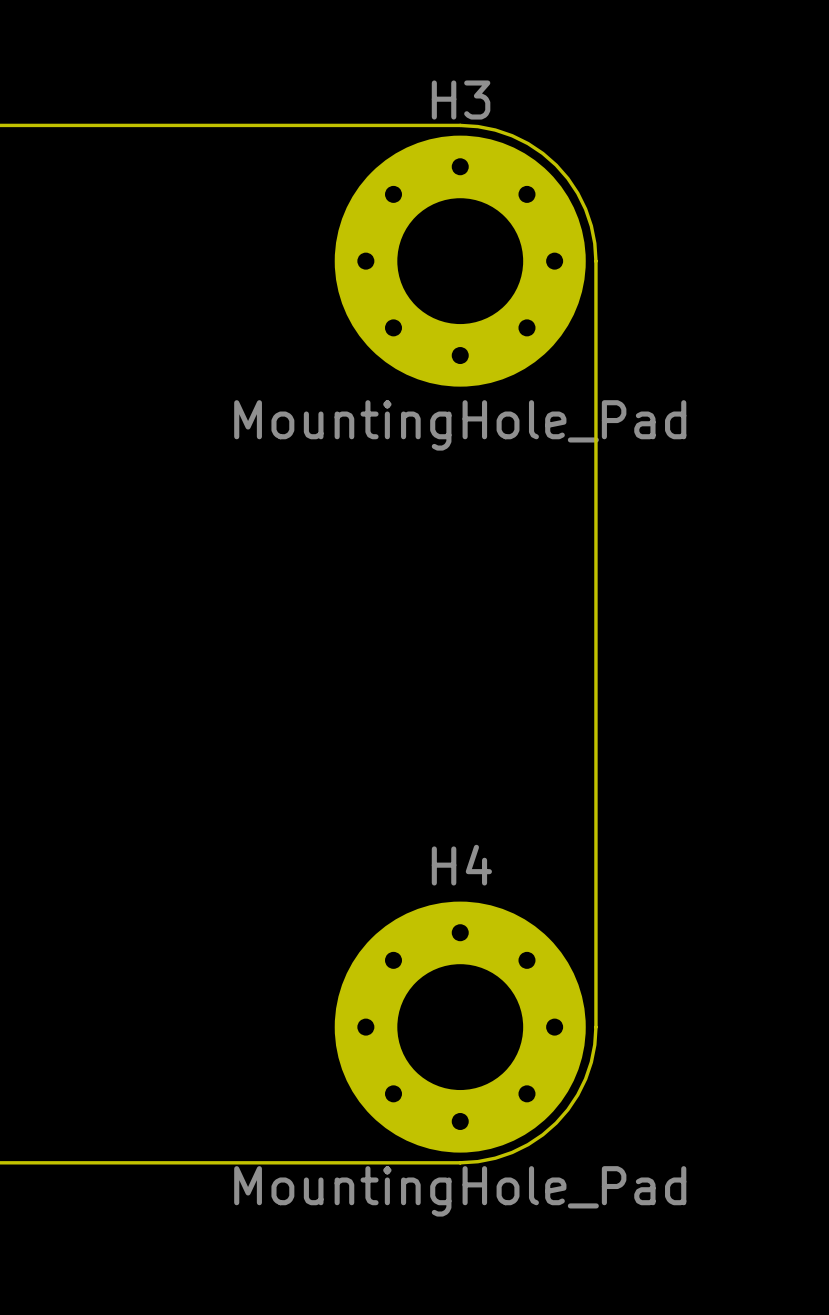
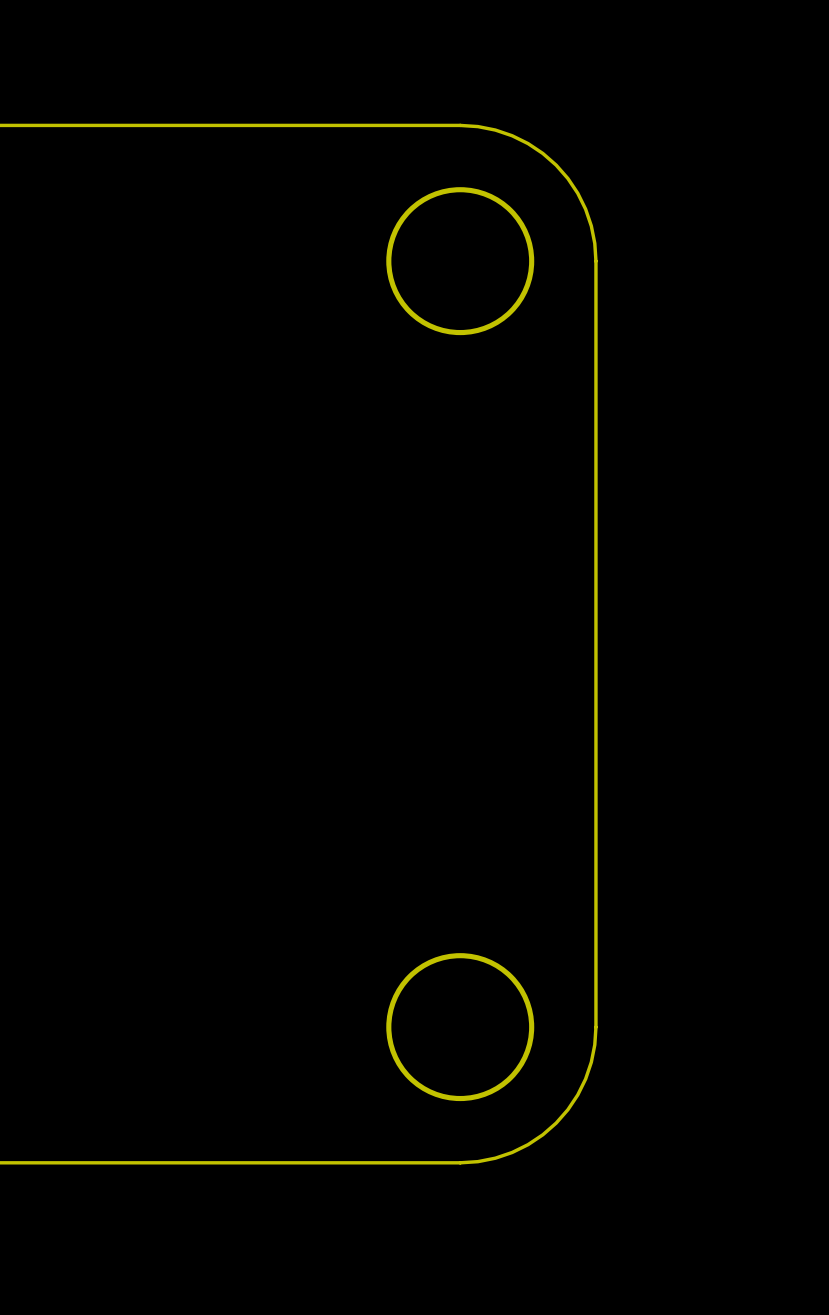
round board edge: none -> [386, 187, 535, 336]
H3: MountingHole_Pad (460, 261) -> none
round board edge: none -> [386, 953, 535, 1102]
H4: MountingHole_Pad (460, 1027) -> none

